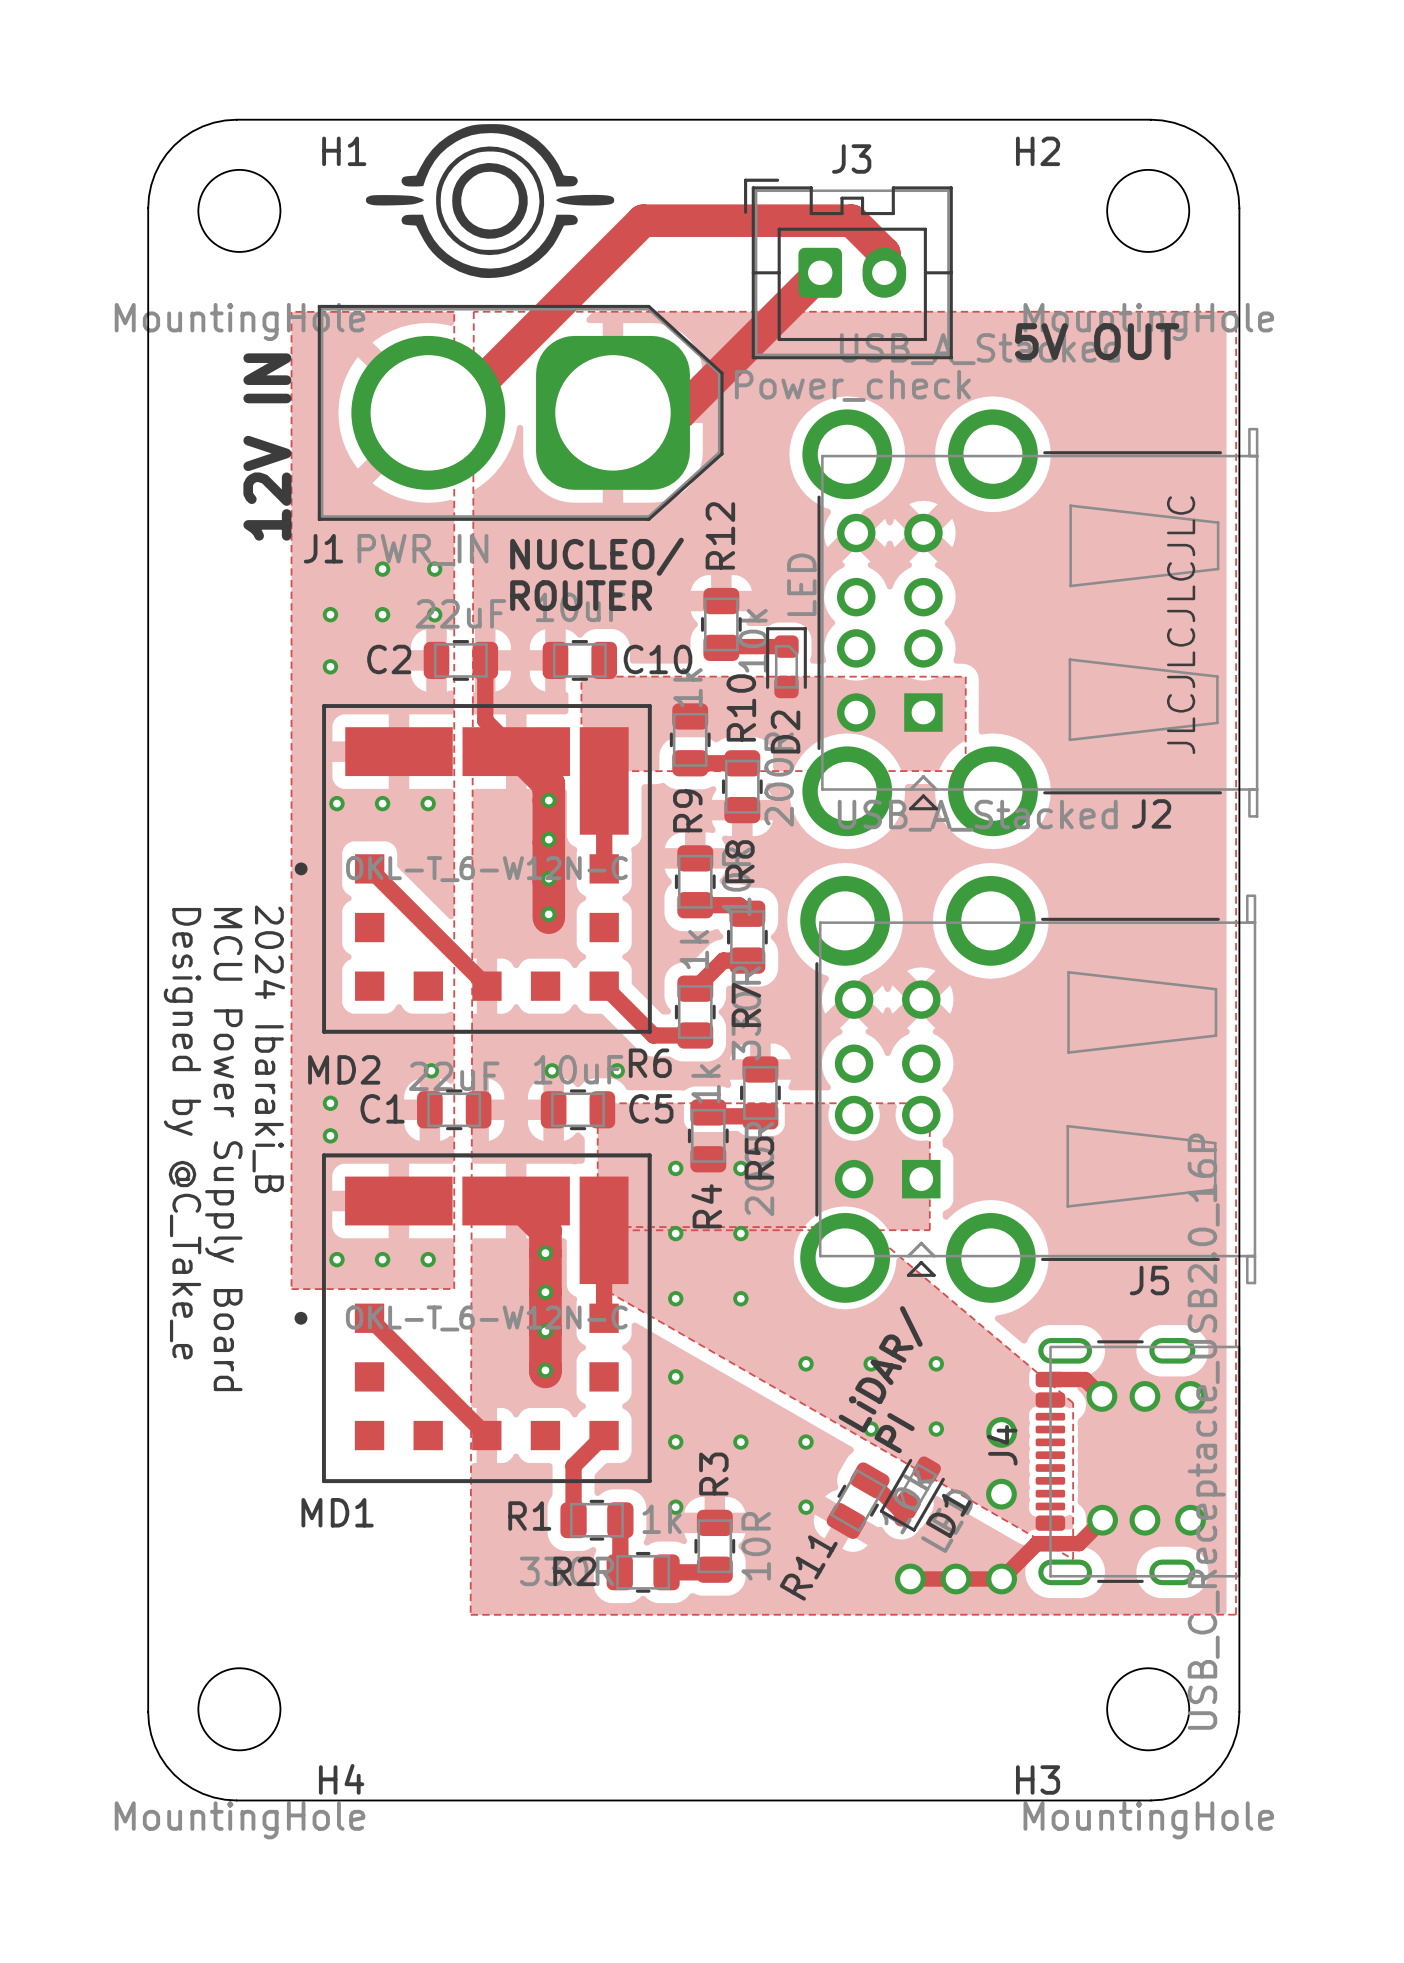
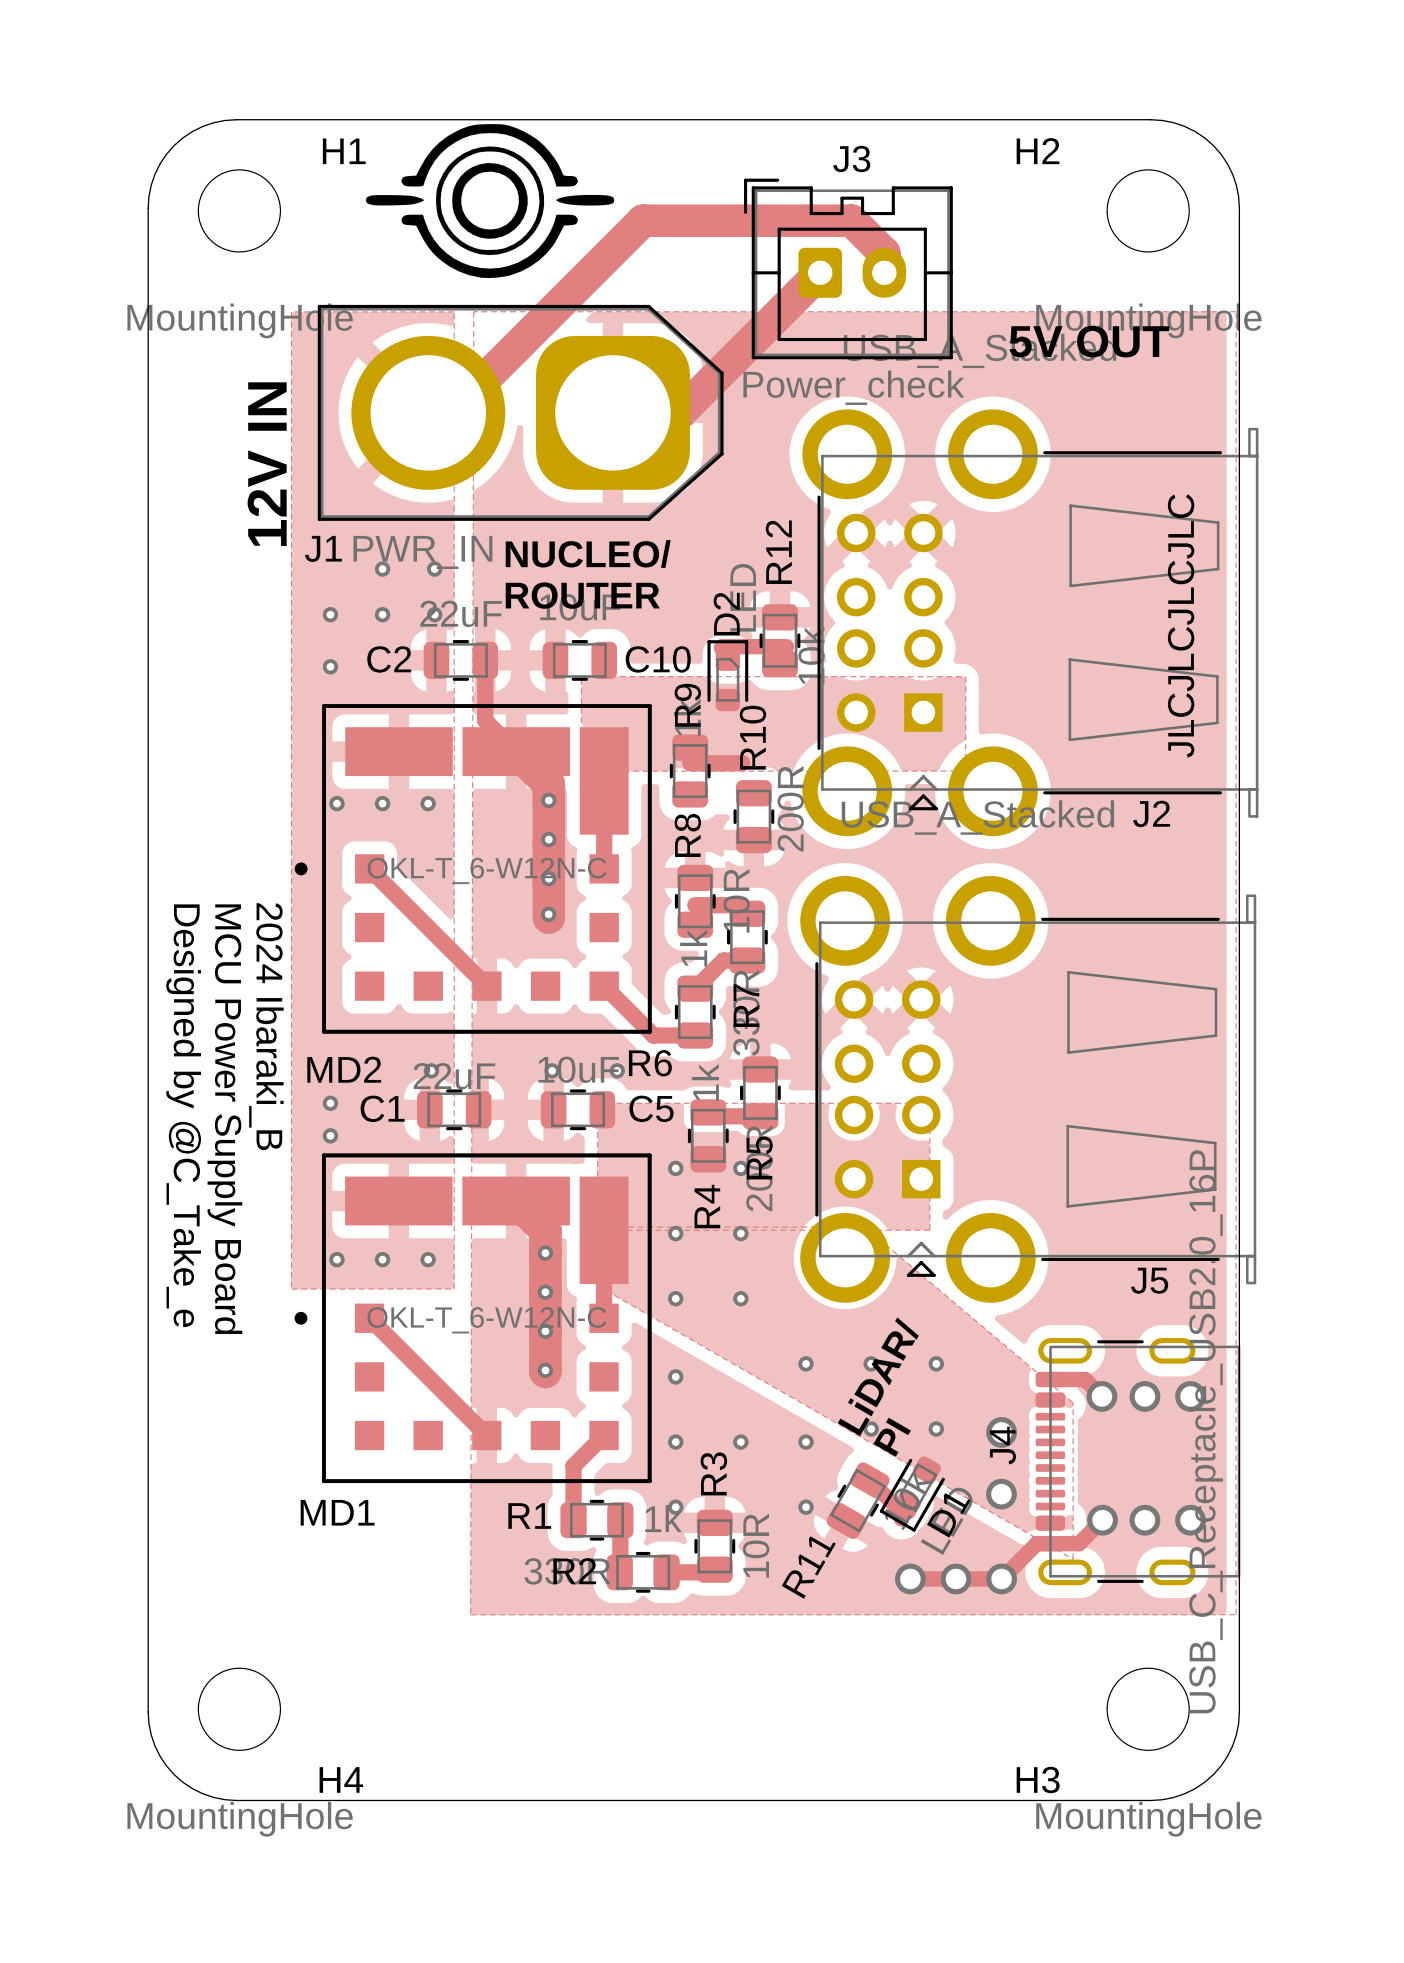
R12 position: (721, 624) -> (779, 640)
D2 position: (786, 662) -> (727, 675)
D2 name position: D2 (785, 731) -> D2 (726, 614)
R9 position: (690, 739) -> (690, 771)
R10 position: (742, 786) -> (753, 816)
R9 name position: R9 (687, 810) -> R9 (687, 705)
R8 name position: R8 (739, 861) -> R8 (687, 835)
R8 position: (695, 881) -> (695, 901)

